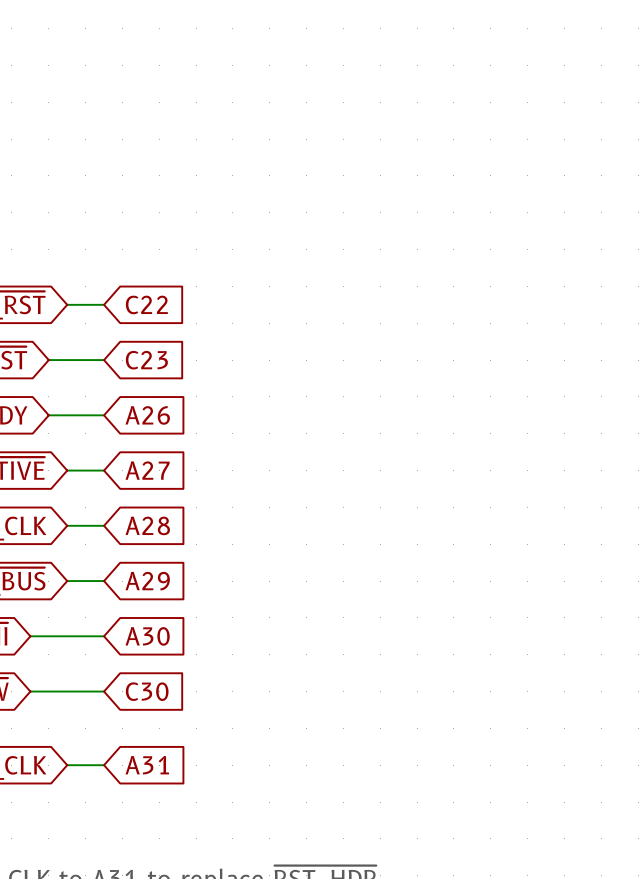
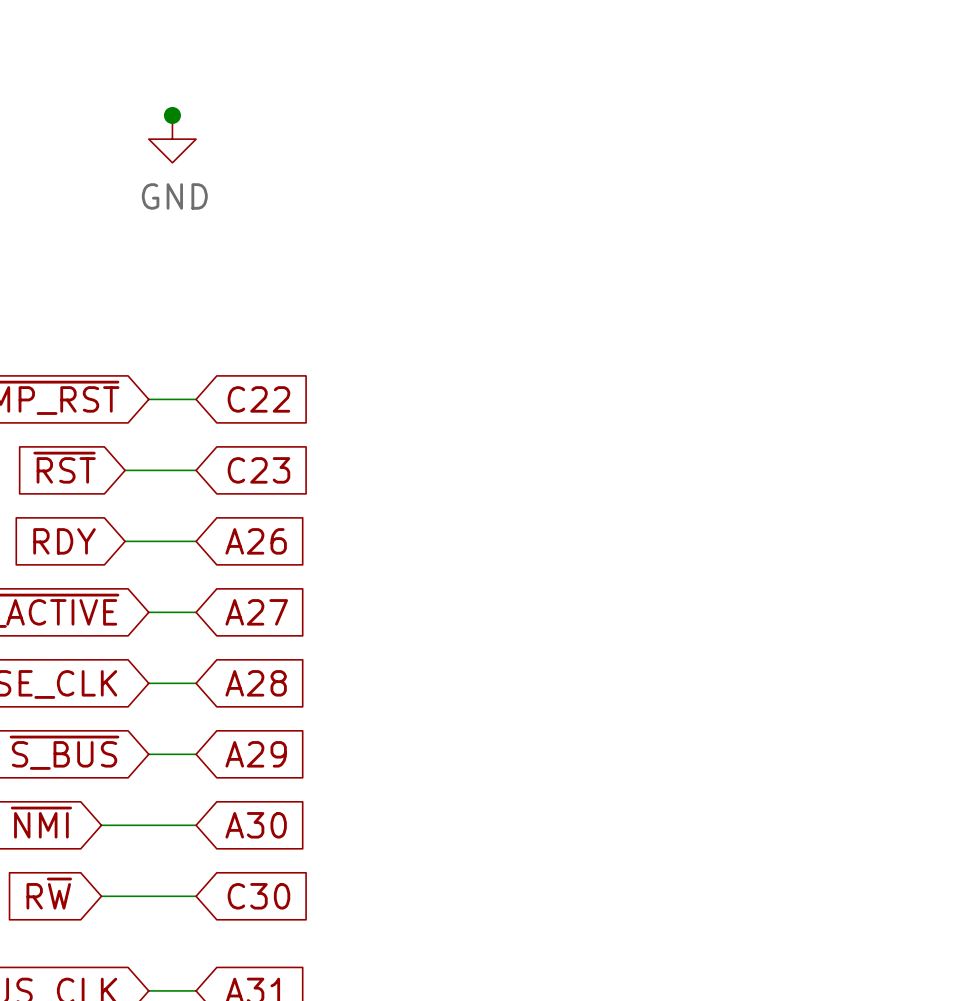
junction: none -> (172, 115)
power symbol: none -> GND (172, 139)

